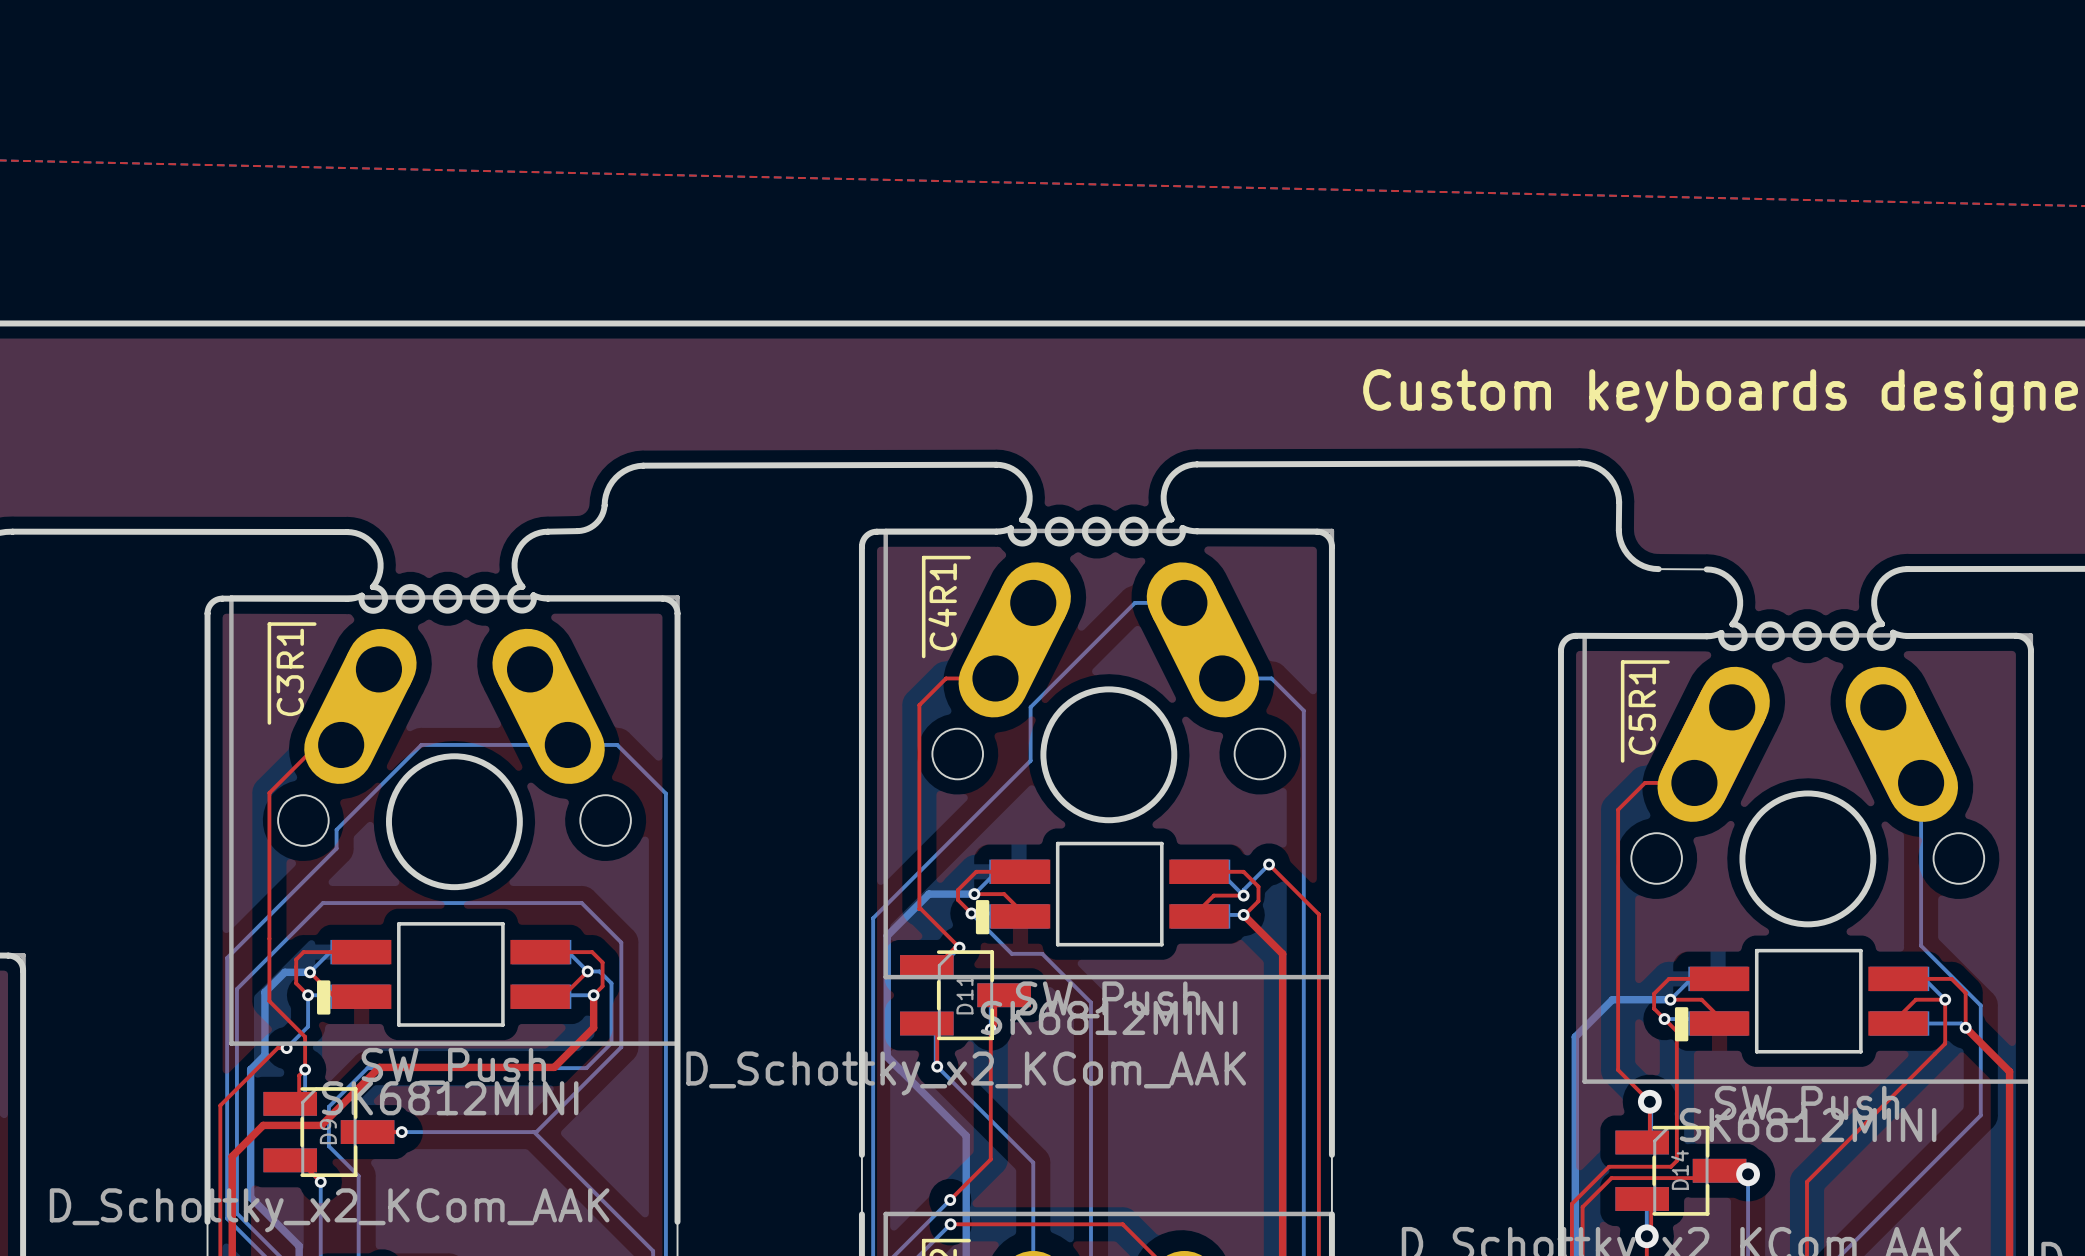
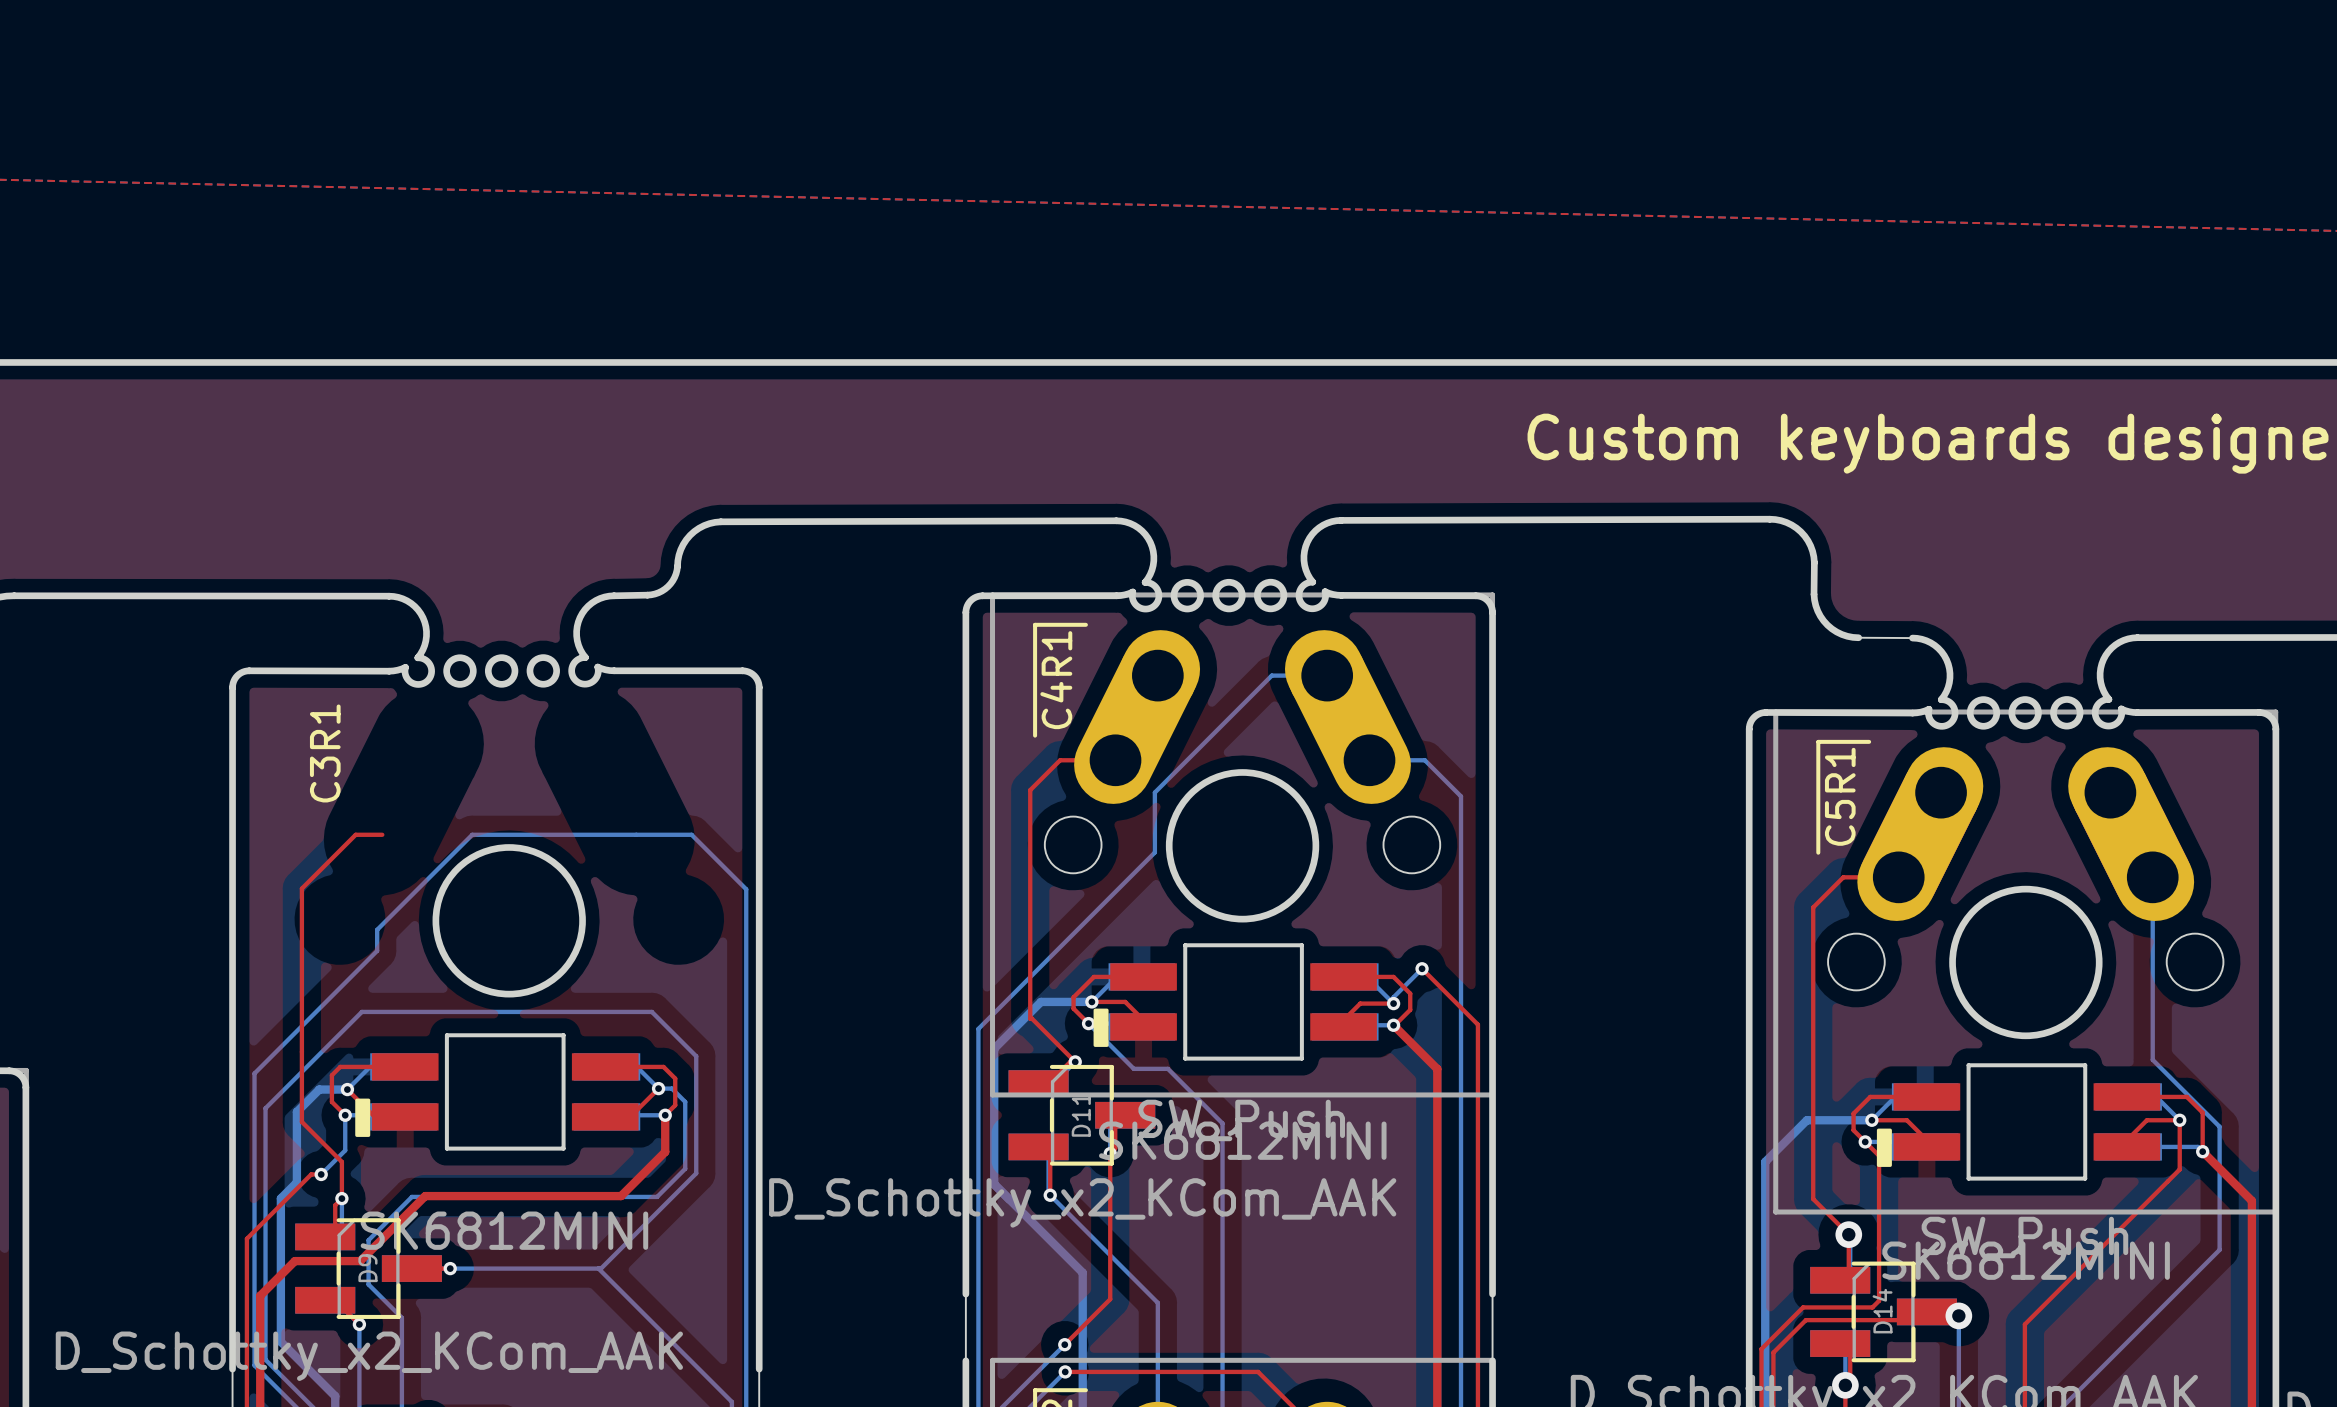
part: SW_Push (454, 820) -> none

